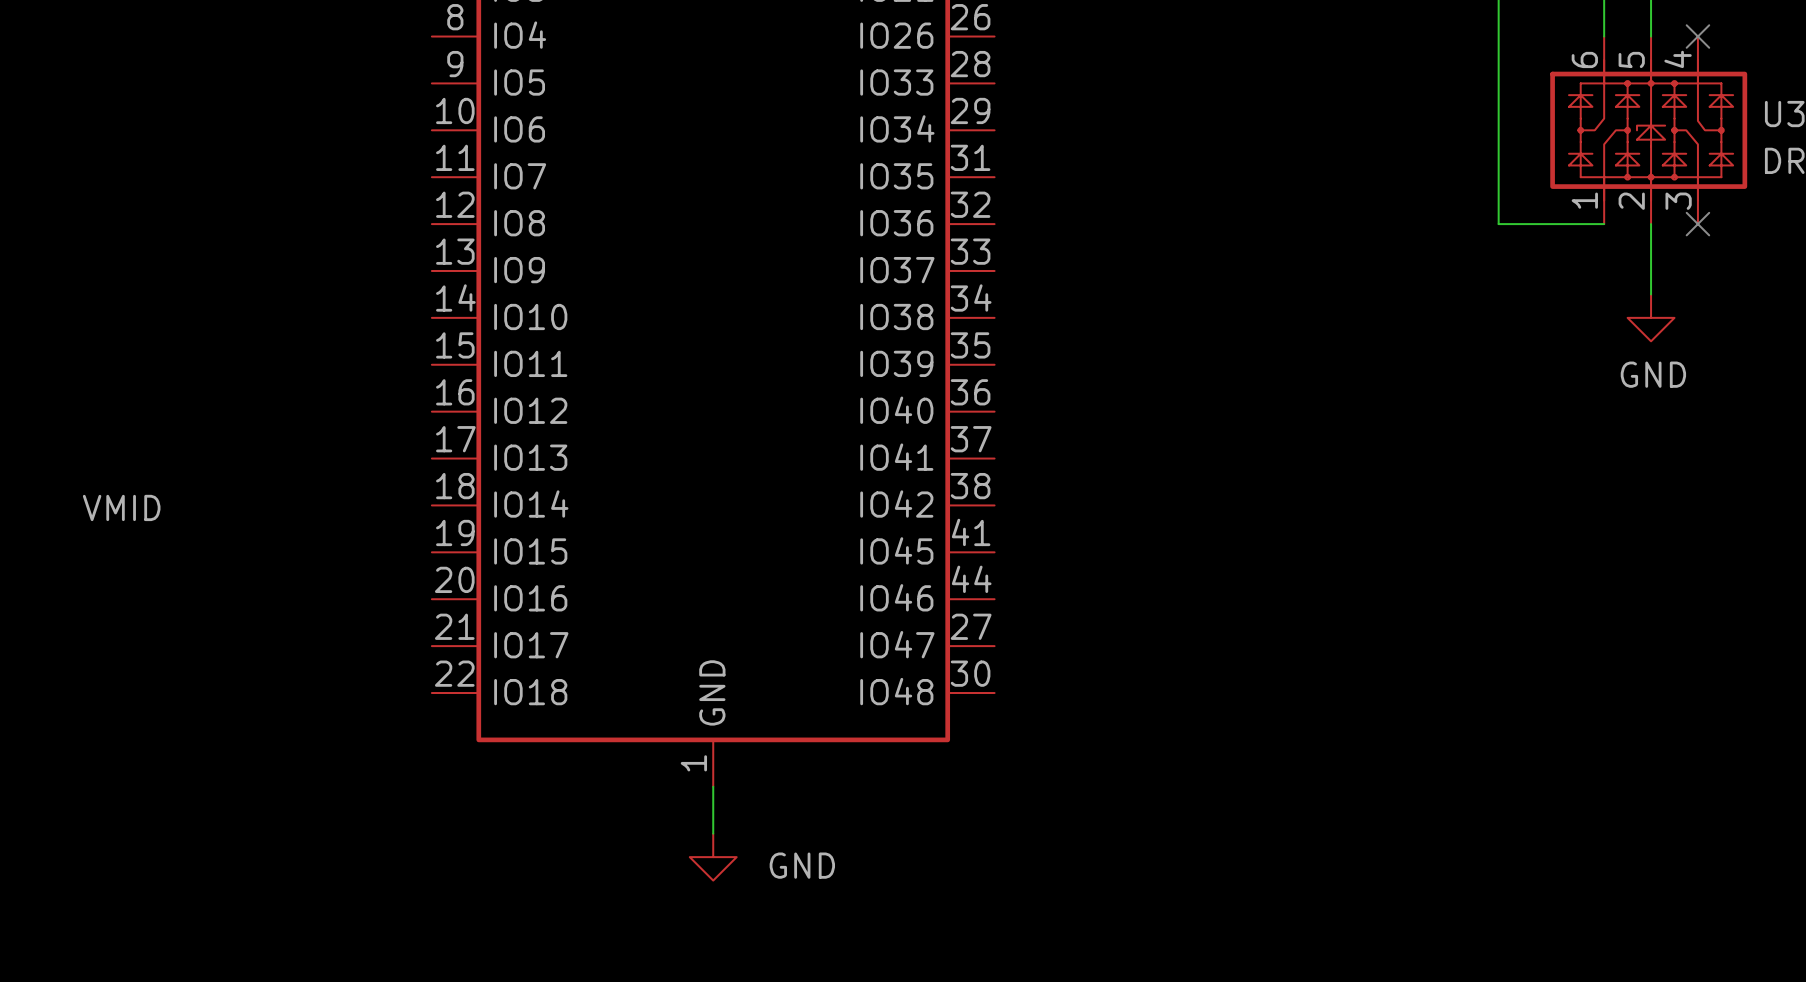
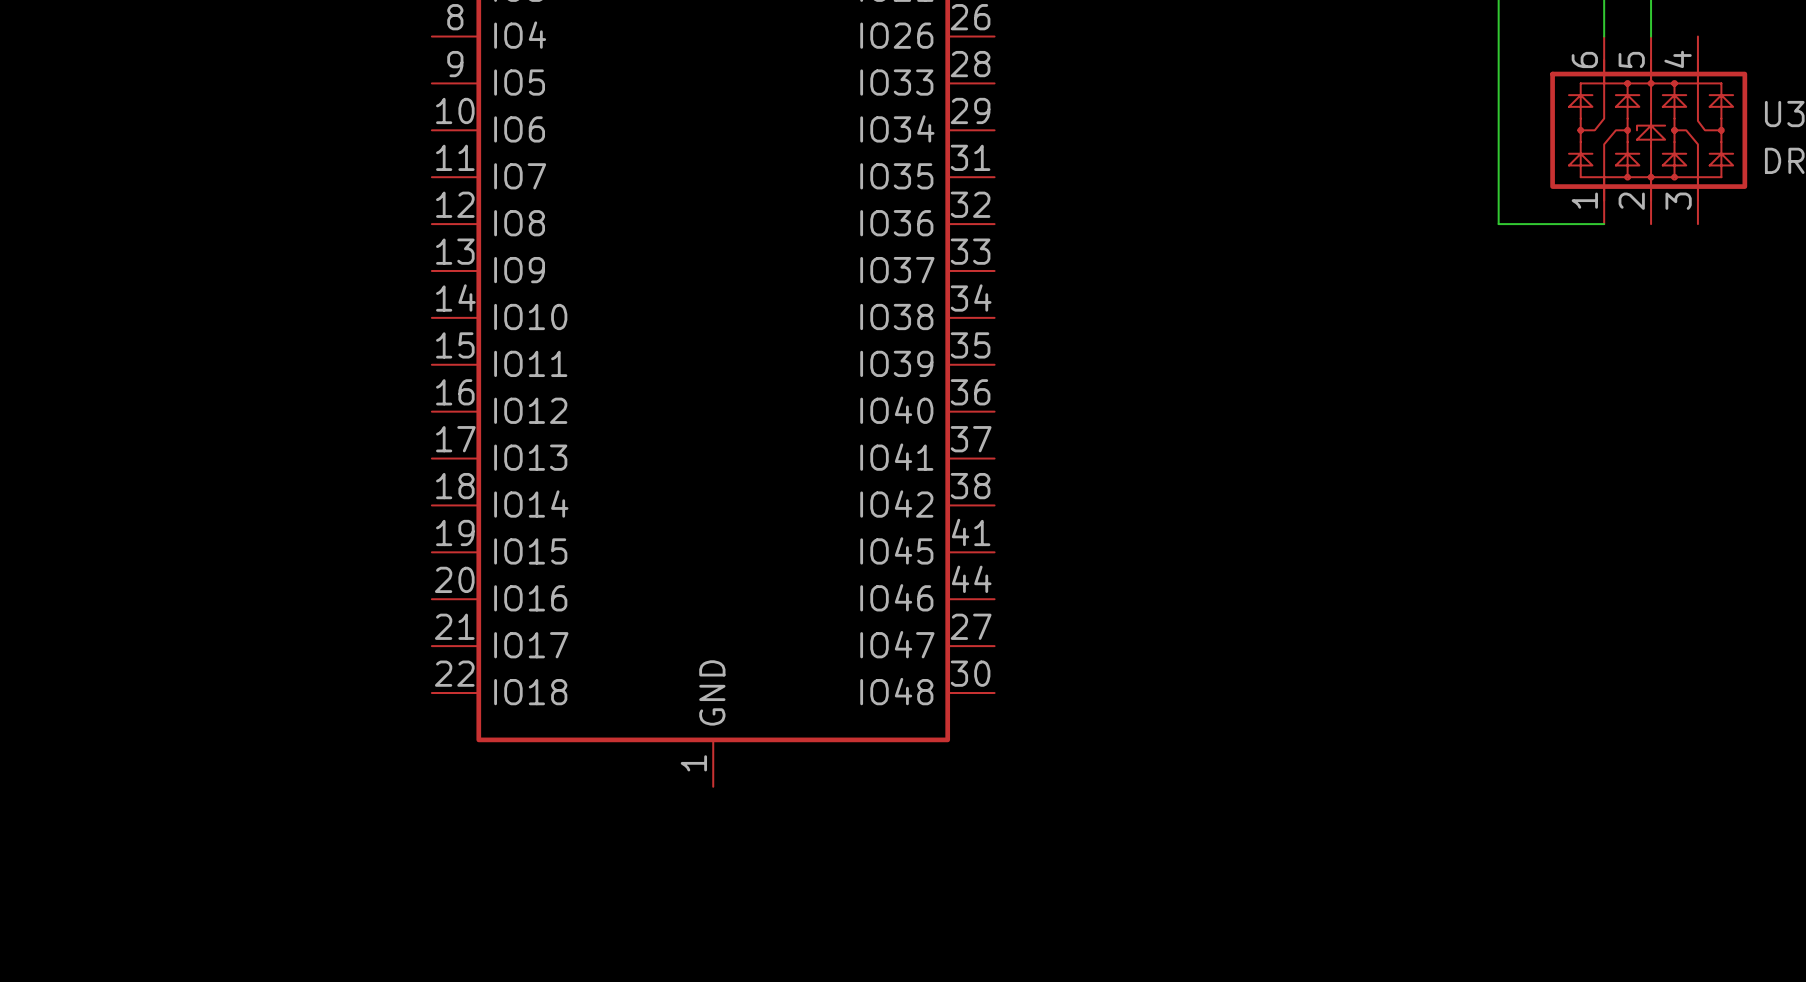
no-connect mark: (1697, 36) -> none
wire: (1651, 224) (1651, 294) -> none
no-connect mark: (1697, 224) -> none
power symbol: GND (1651, 317) -> none
label: VMID (121, 507) -> none
wire: (713, 786) (713, 833) -> none
power symbol: GND (713, 857) -> none

